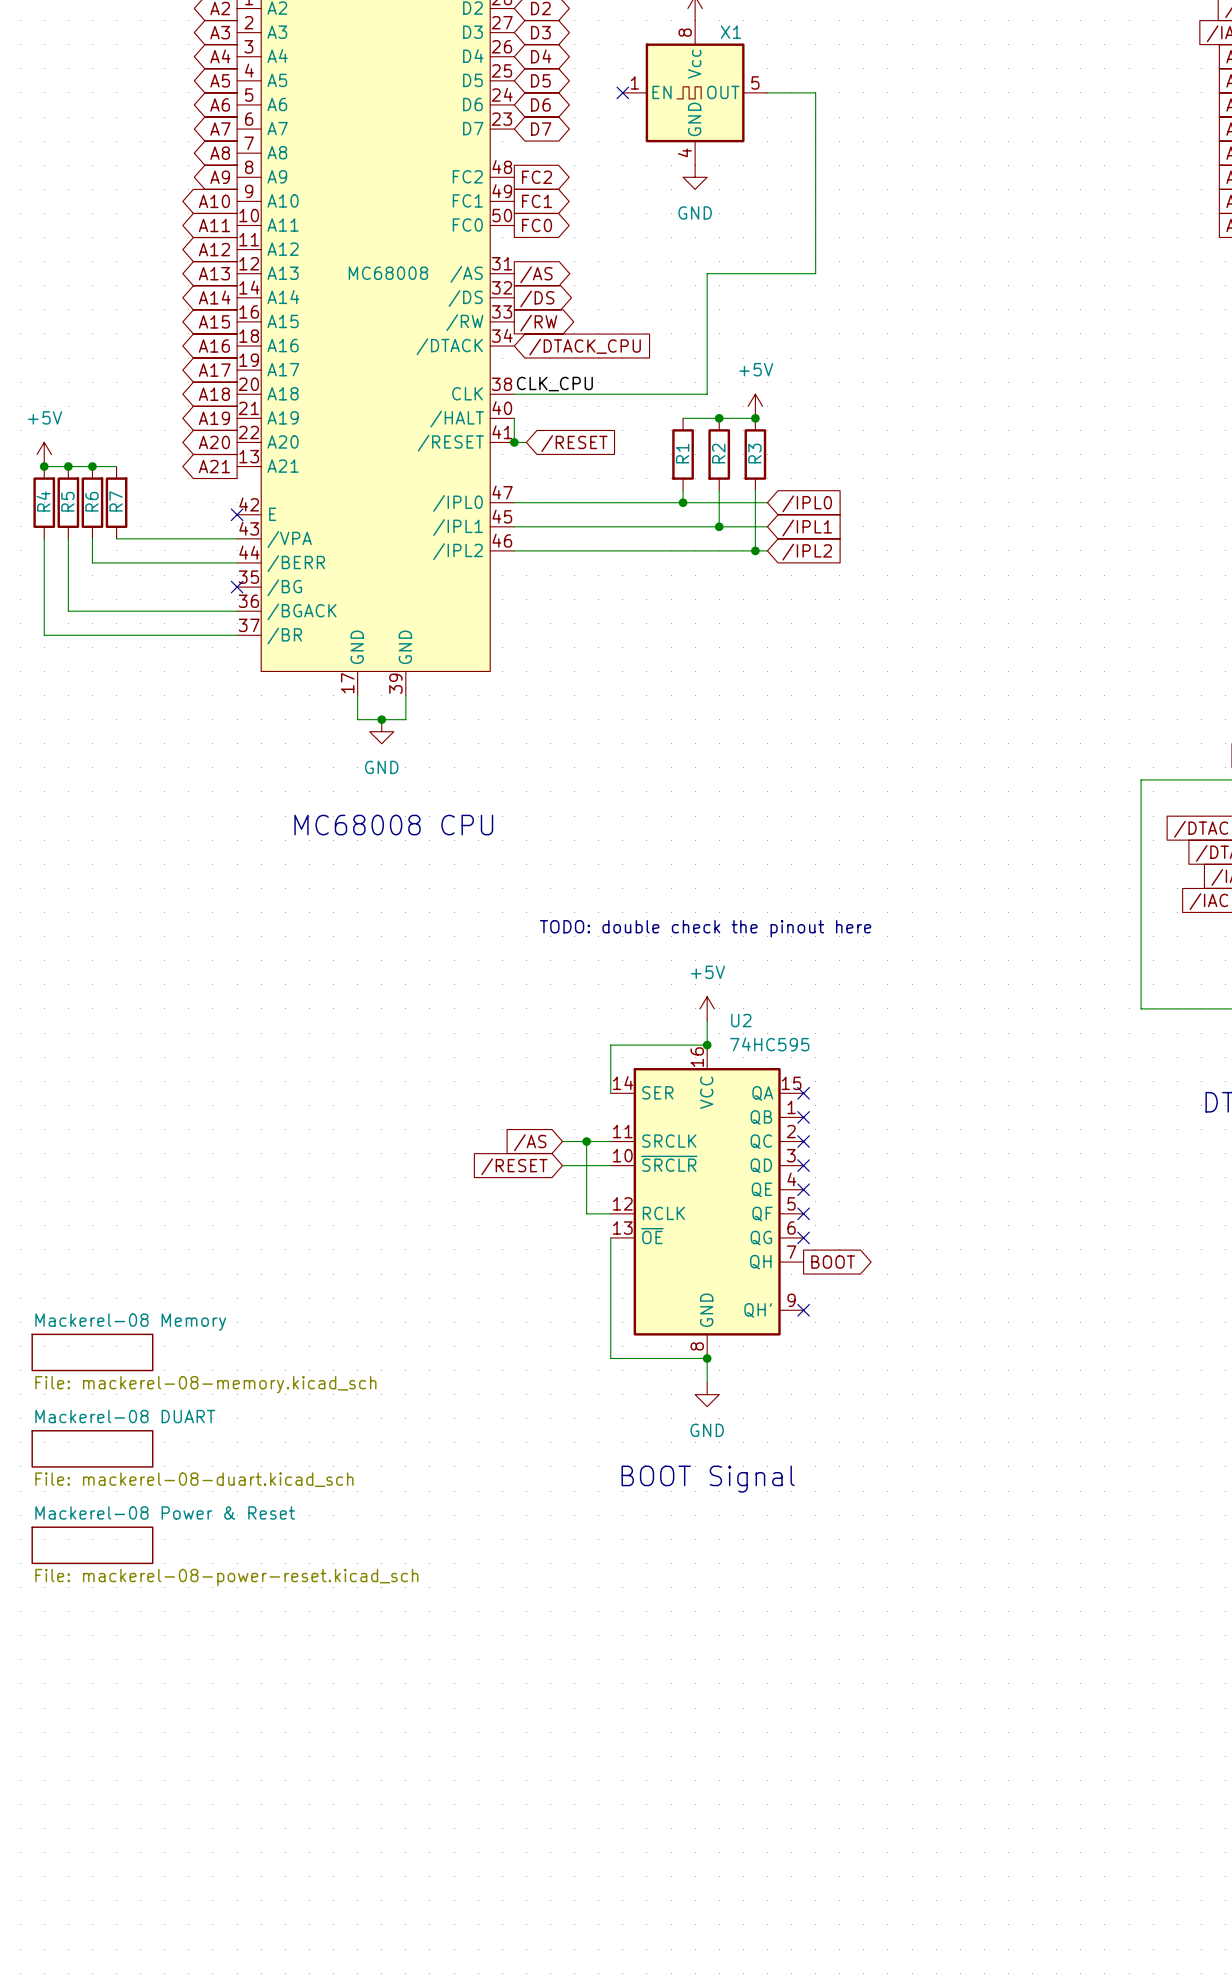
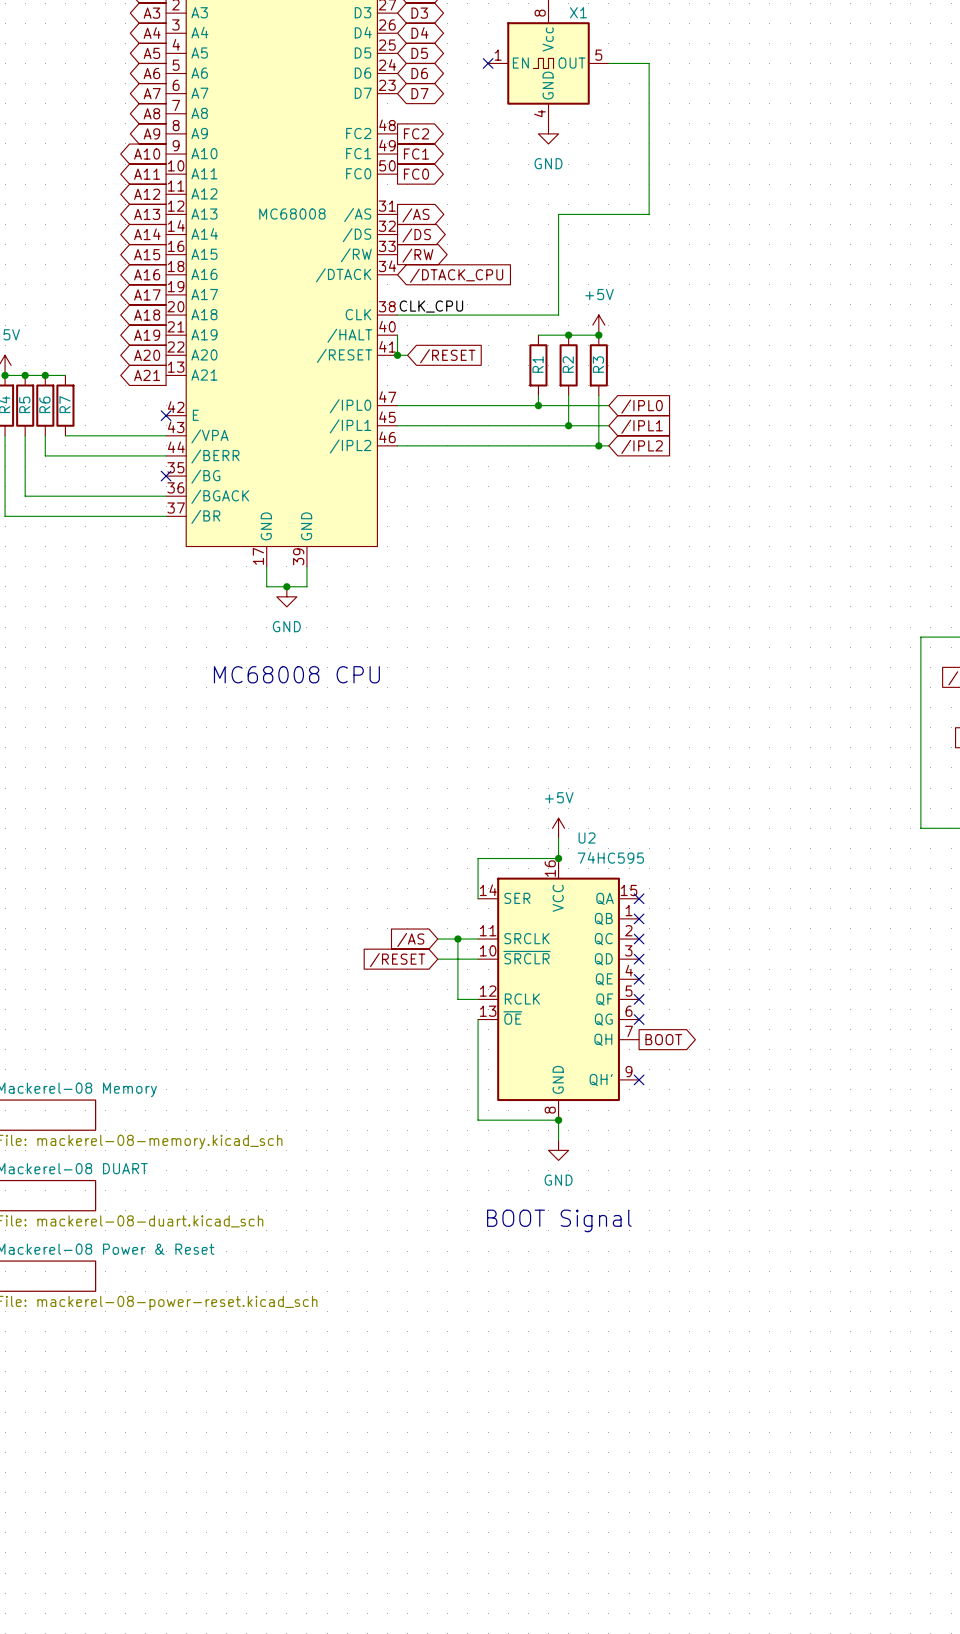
text: TODO: double check the pinout here (705, 928) -> none

